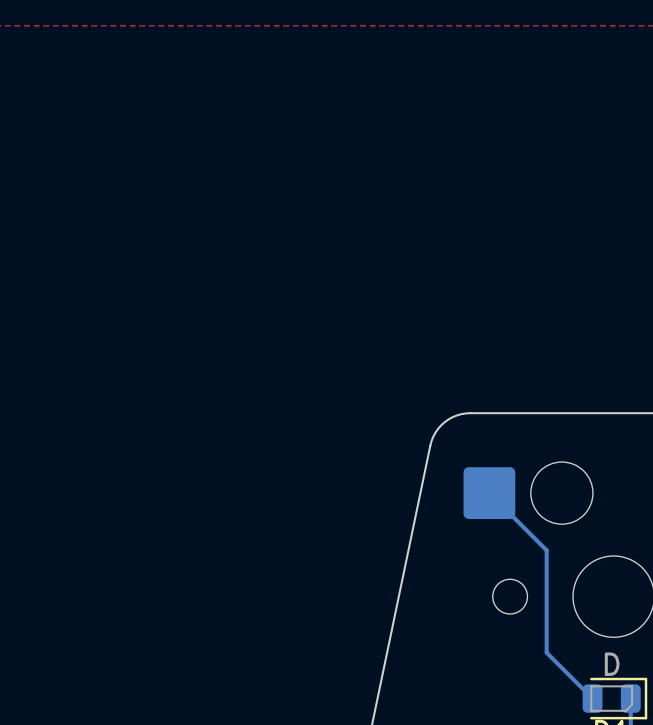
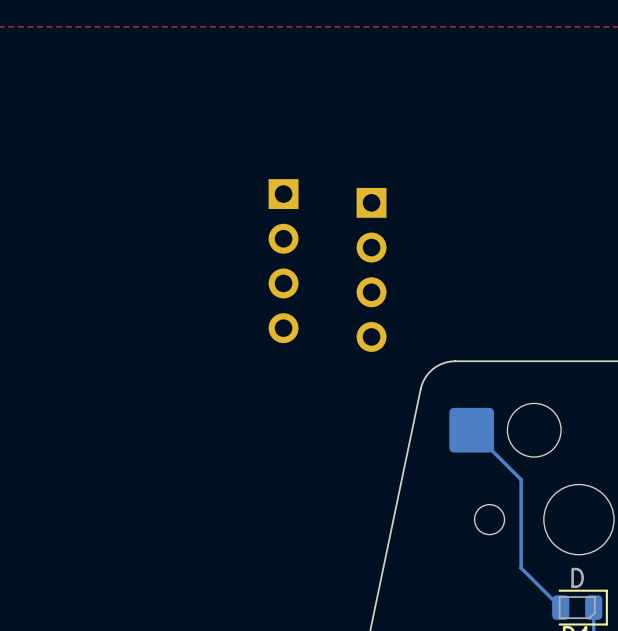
part: none -> (283, 261)
part: none -> (371, 269)

